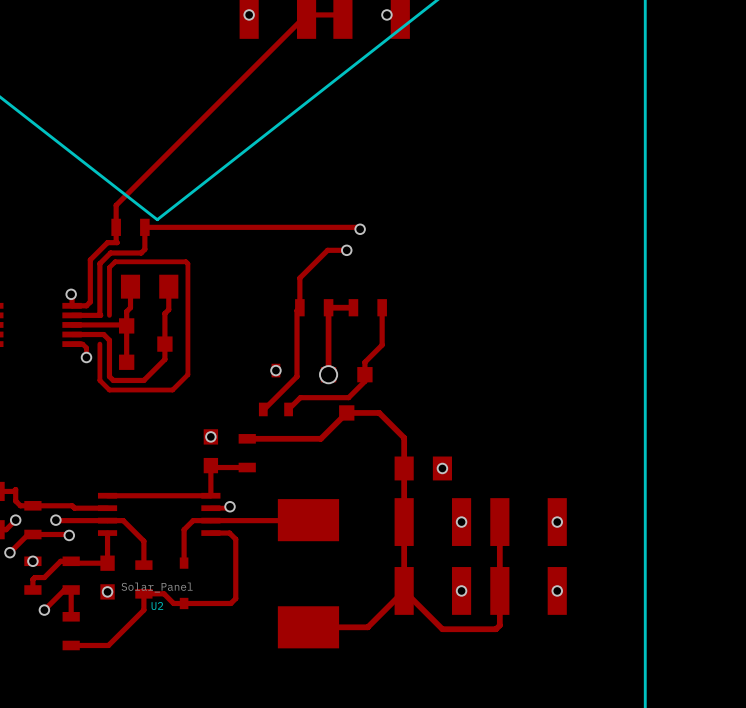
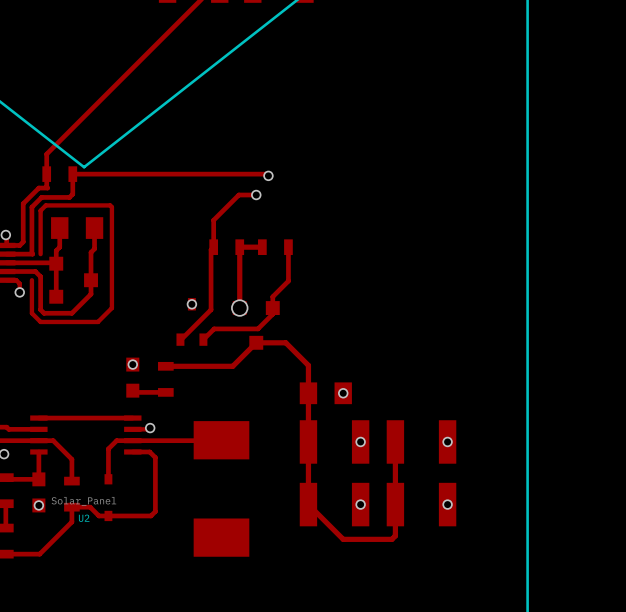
top track: (210, 465) (210, 495) -> none
top track: (404, 590) (367, 627) (308, 627) -> none

